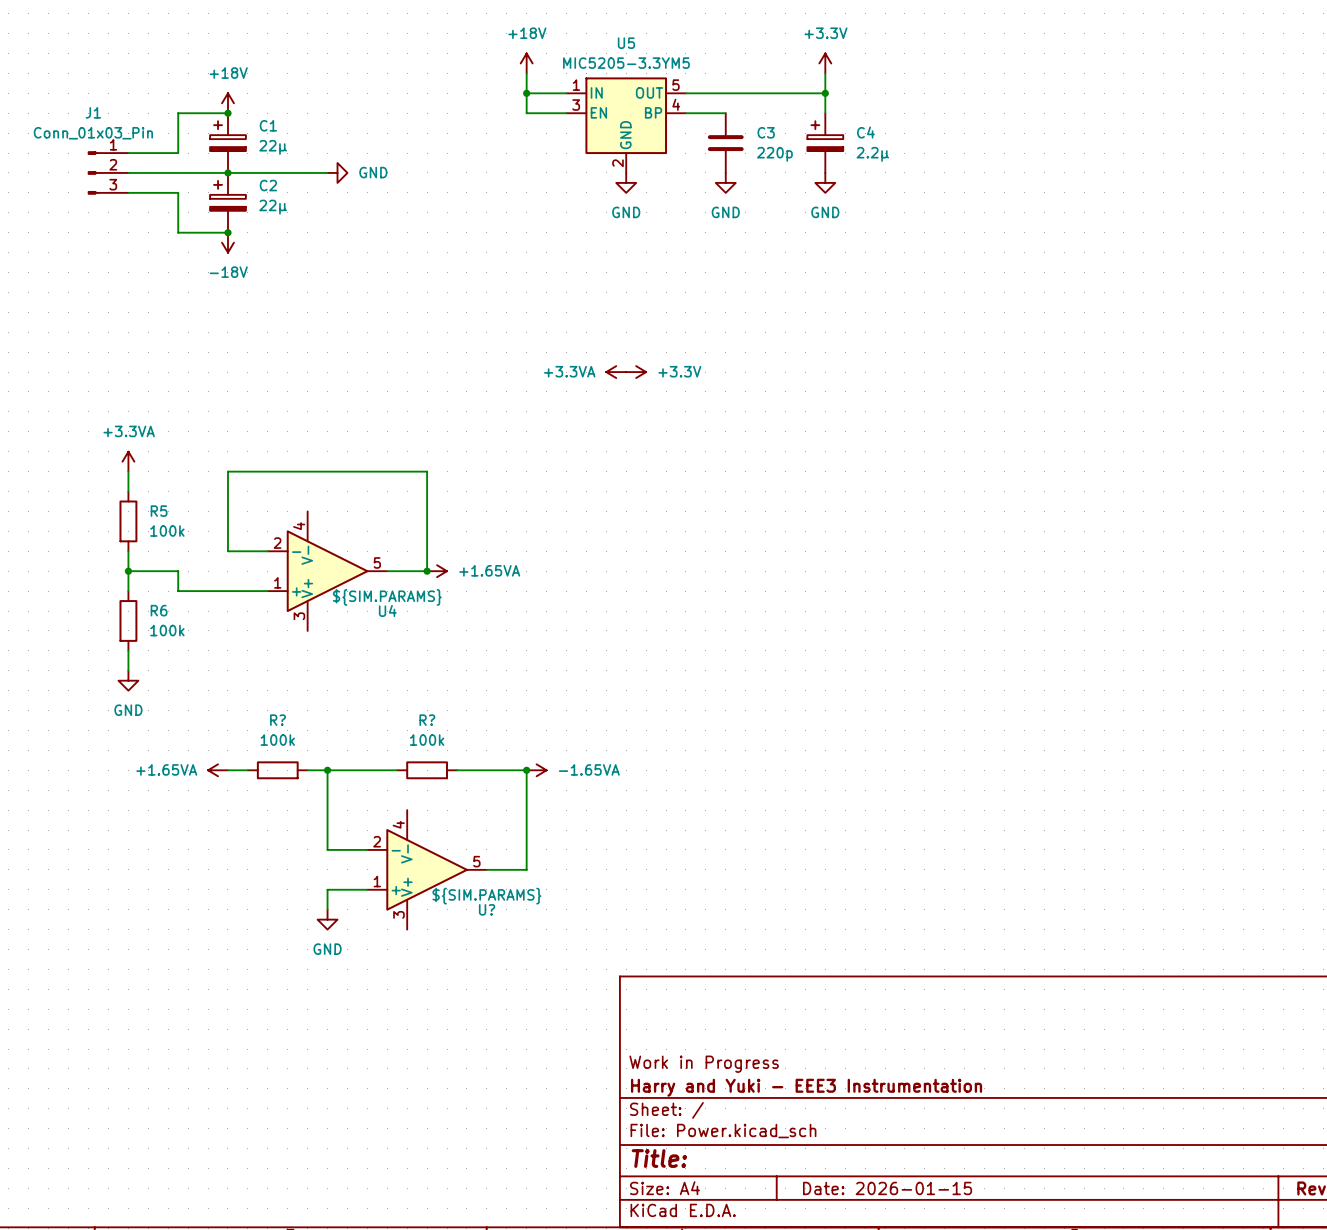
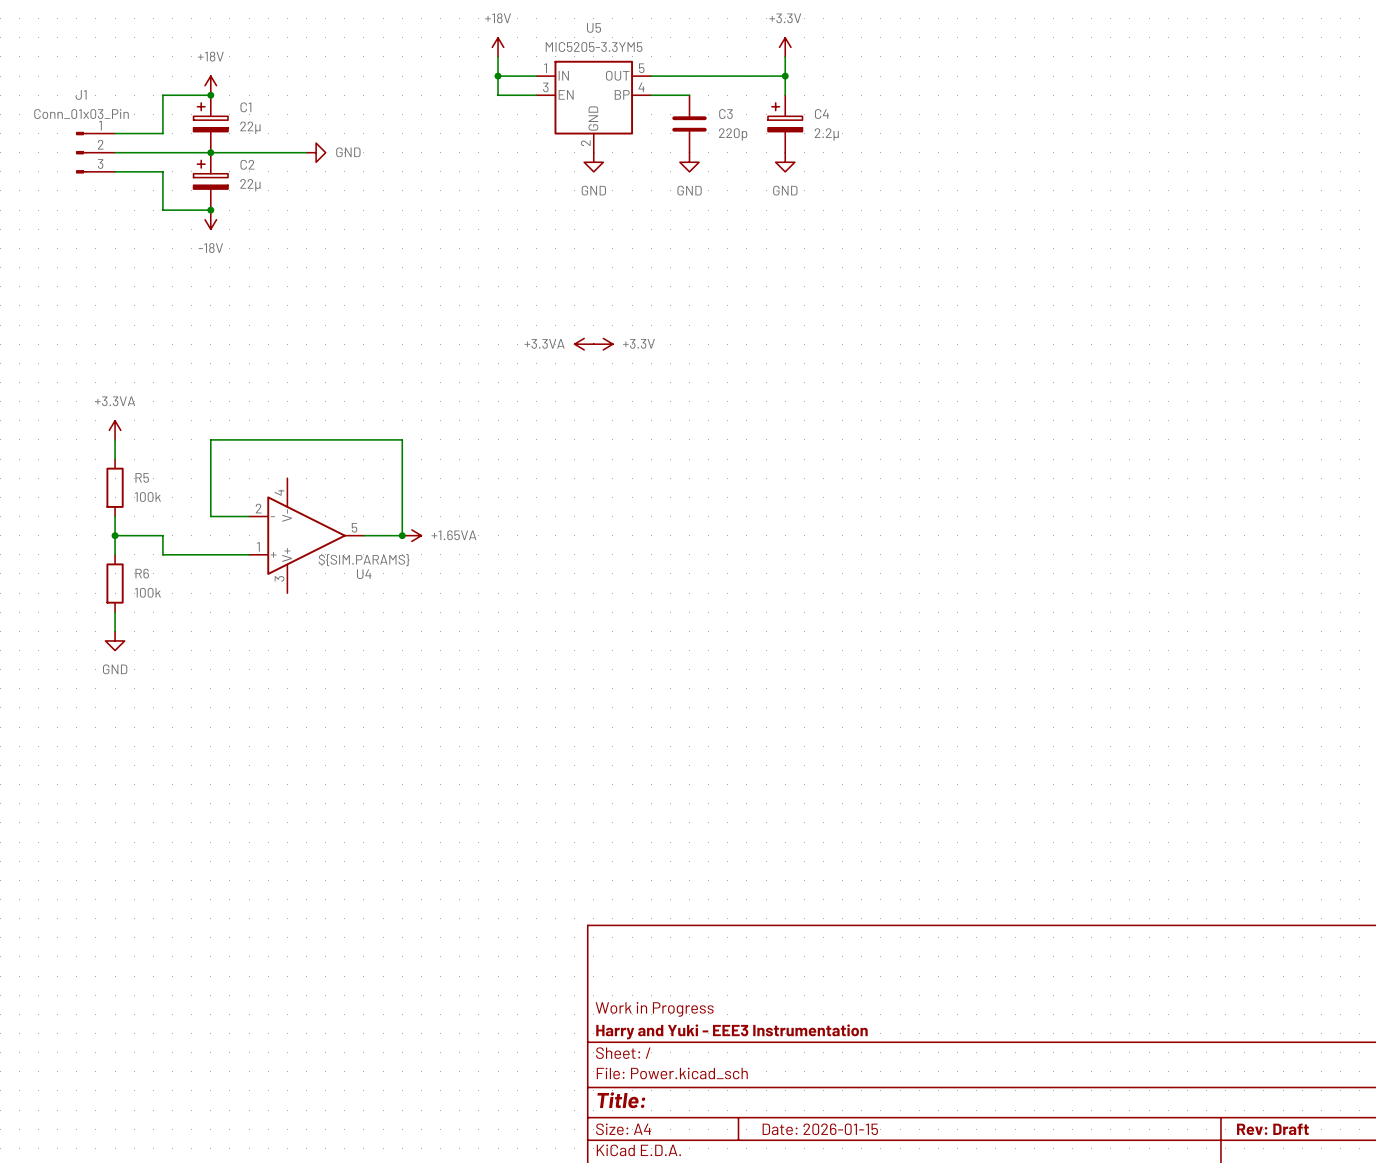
power symbol: +1.65VA (218, 770) -> none
wire: (227, 770) (247, 770) -> none
R?: 100k (277, 770) -> none
wire: (307, 770) (397, 770) -> none
wire: (327, 770) (327, 849) (367, 849) -> none
junction: (327, 770) -> none
R?: 100k (427, 770) -> none
wire: (456, 770) (526, 770) (526, 869) (486, 869) -> none
junction: (526, 770) -> none
power symbol: -1.65VA (536, 770) -> none
U?: ${SIM.PARAMS} (427, 869) -> none
wire: (367, 889) (327, 889) (327, 909) -> none
power symbol: GND (327, 919) -> none

